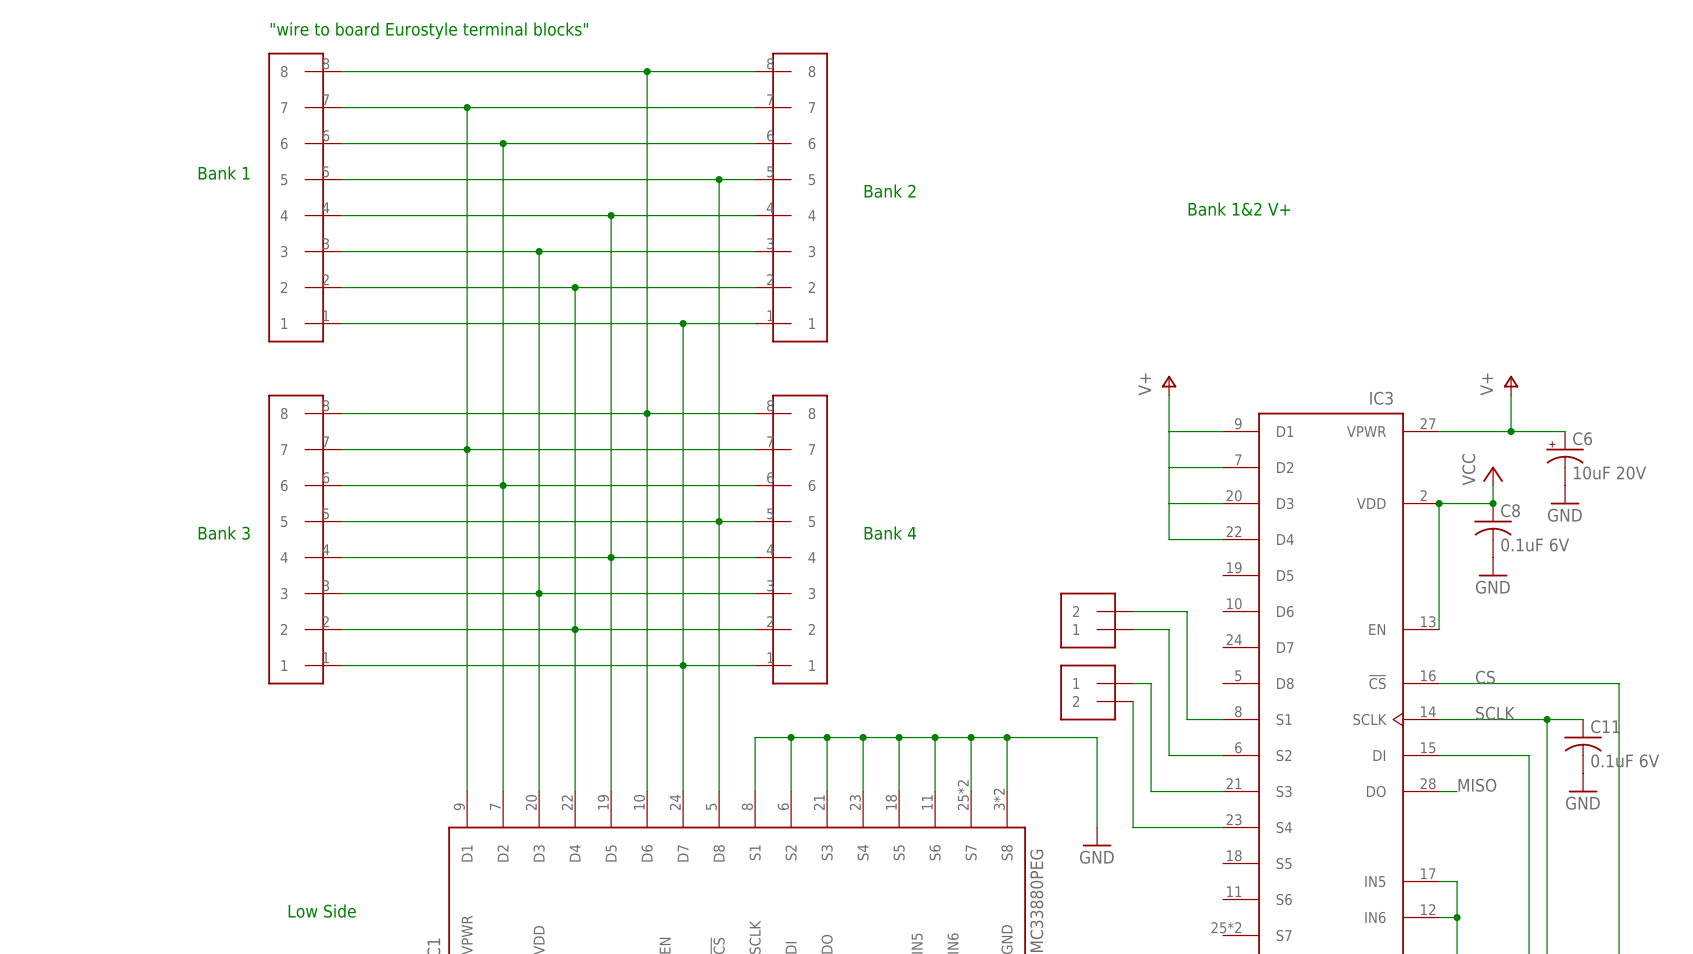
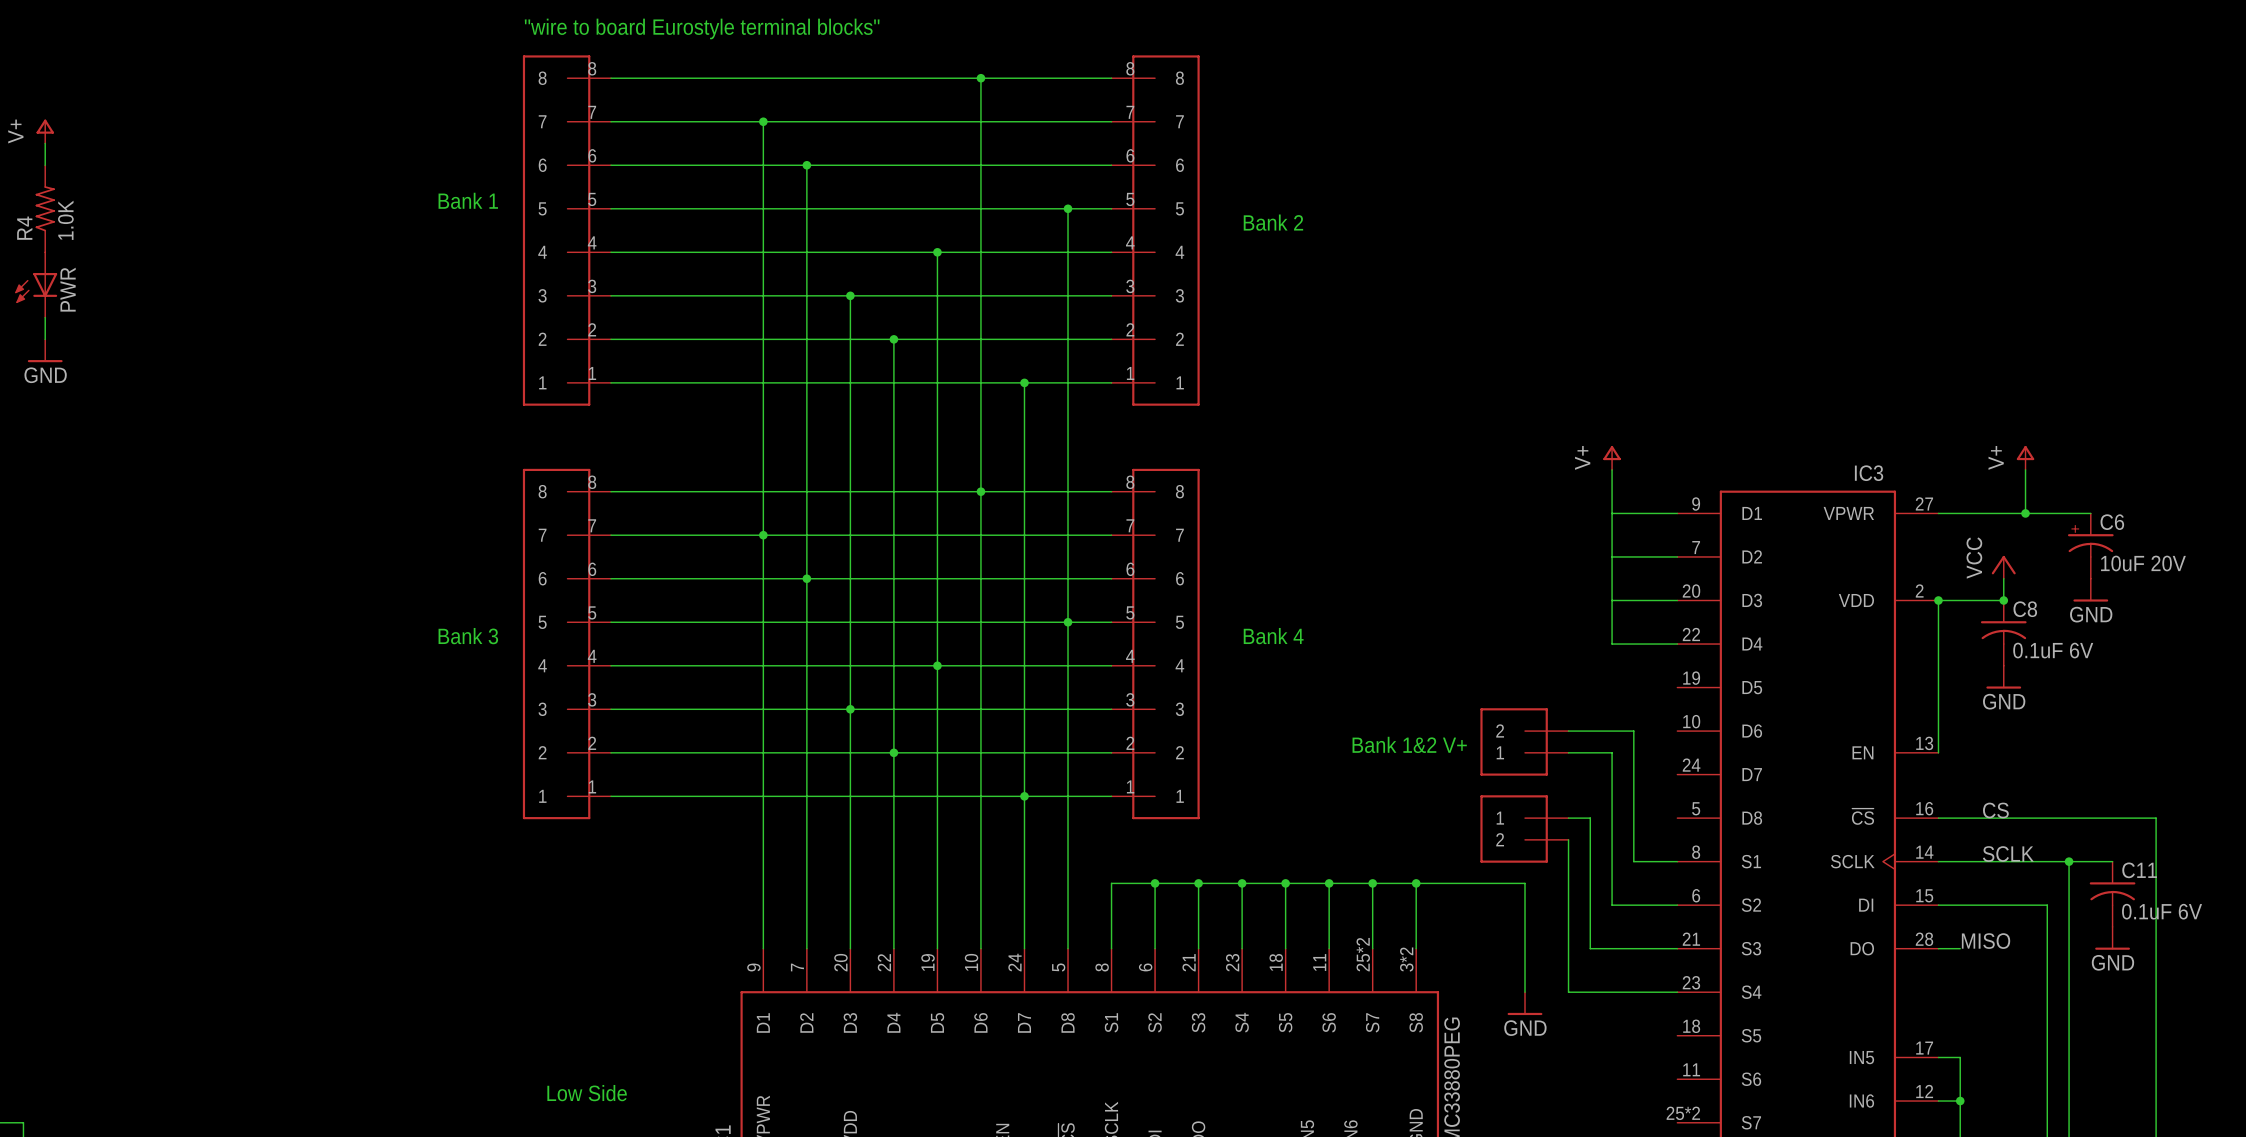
text: Bank 1&2 V+ (1239, 209) -> none
text: none -> Bank 1&2 V+ (1409, 744)

